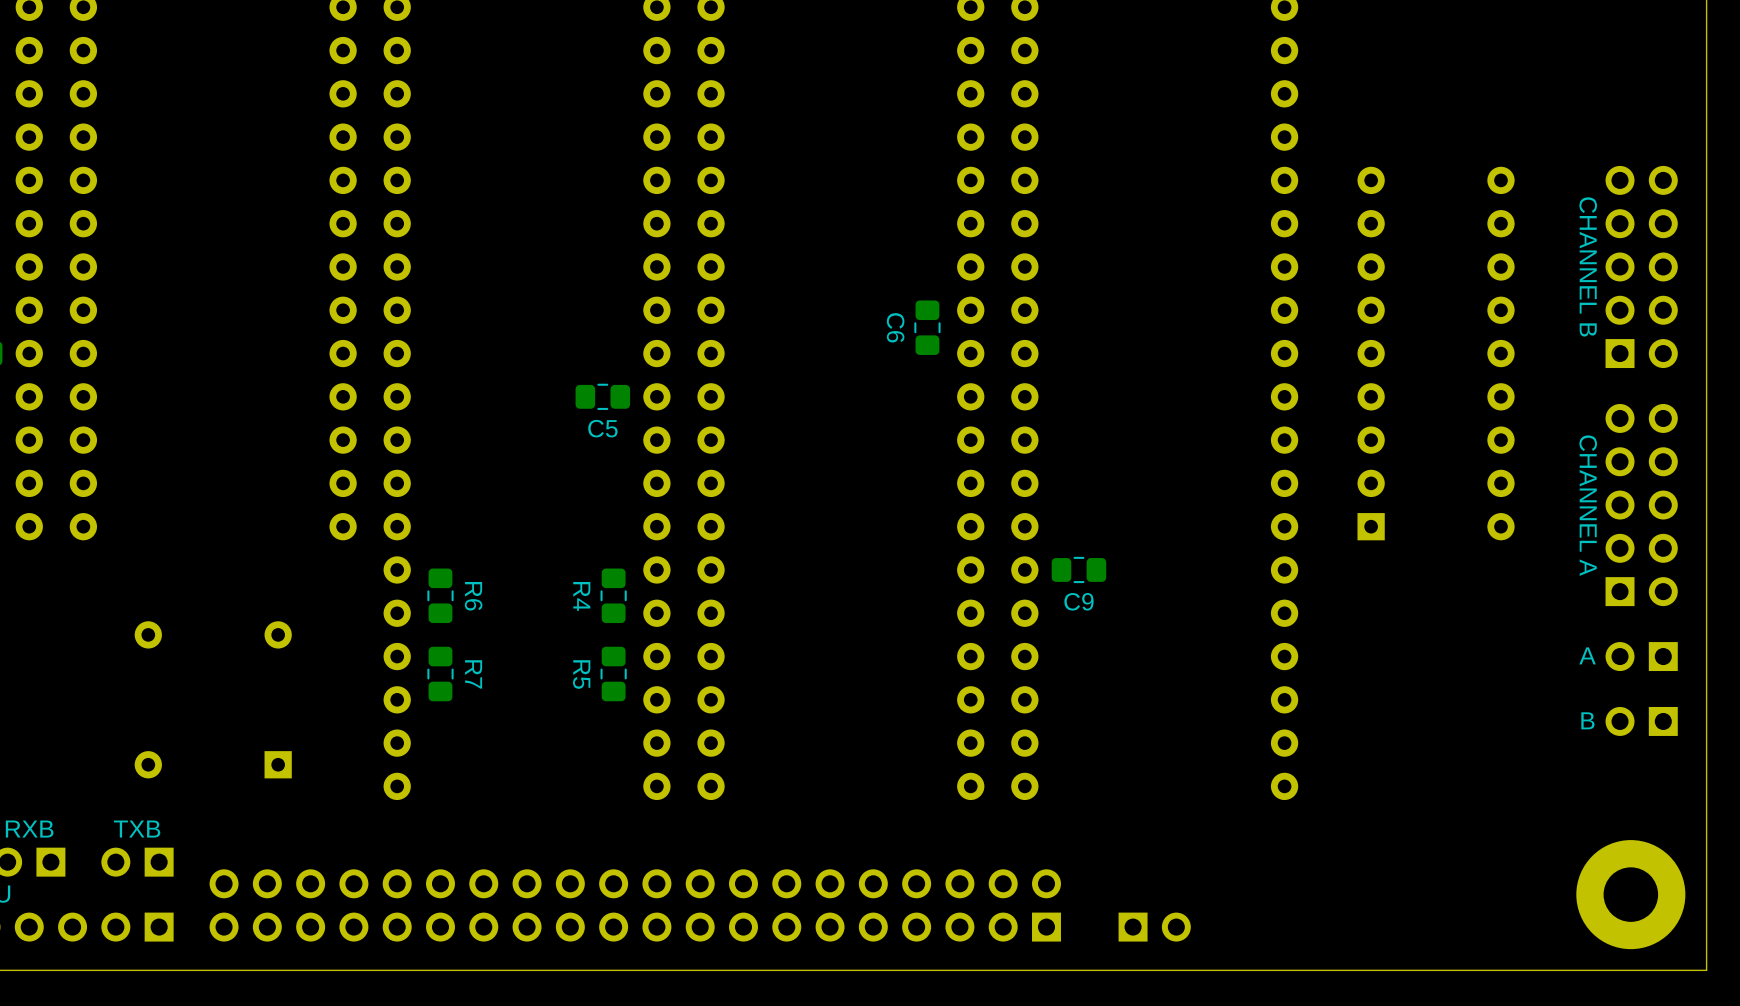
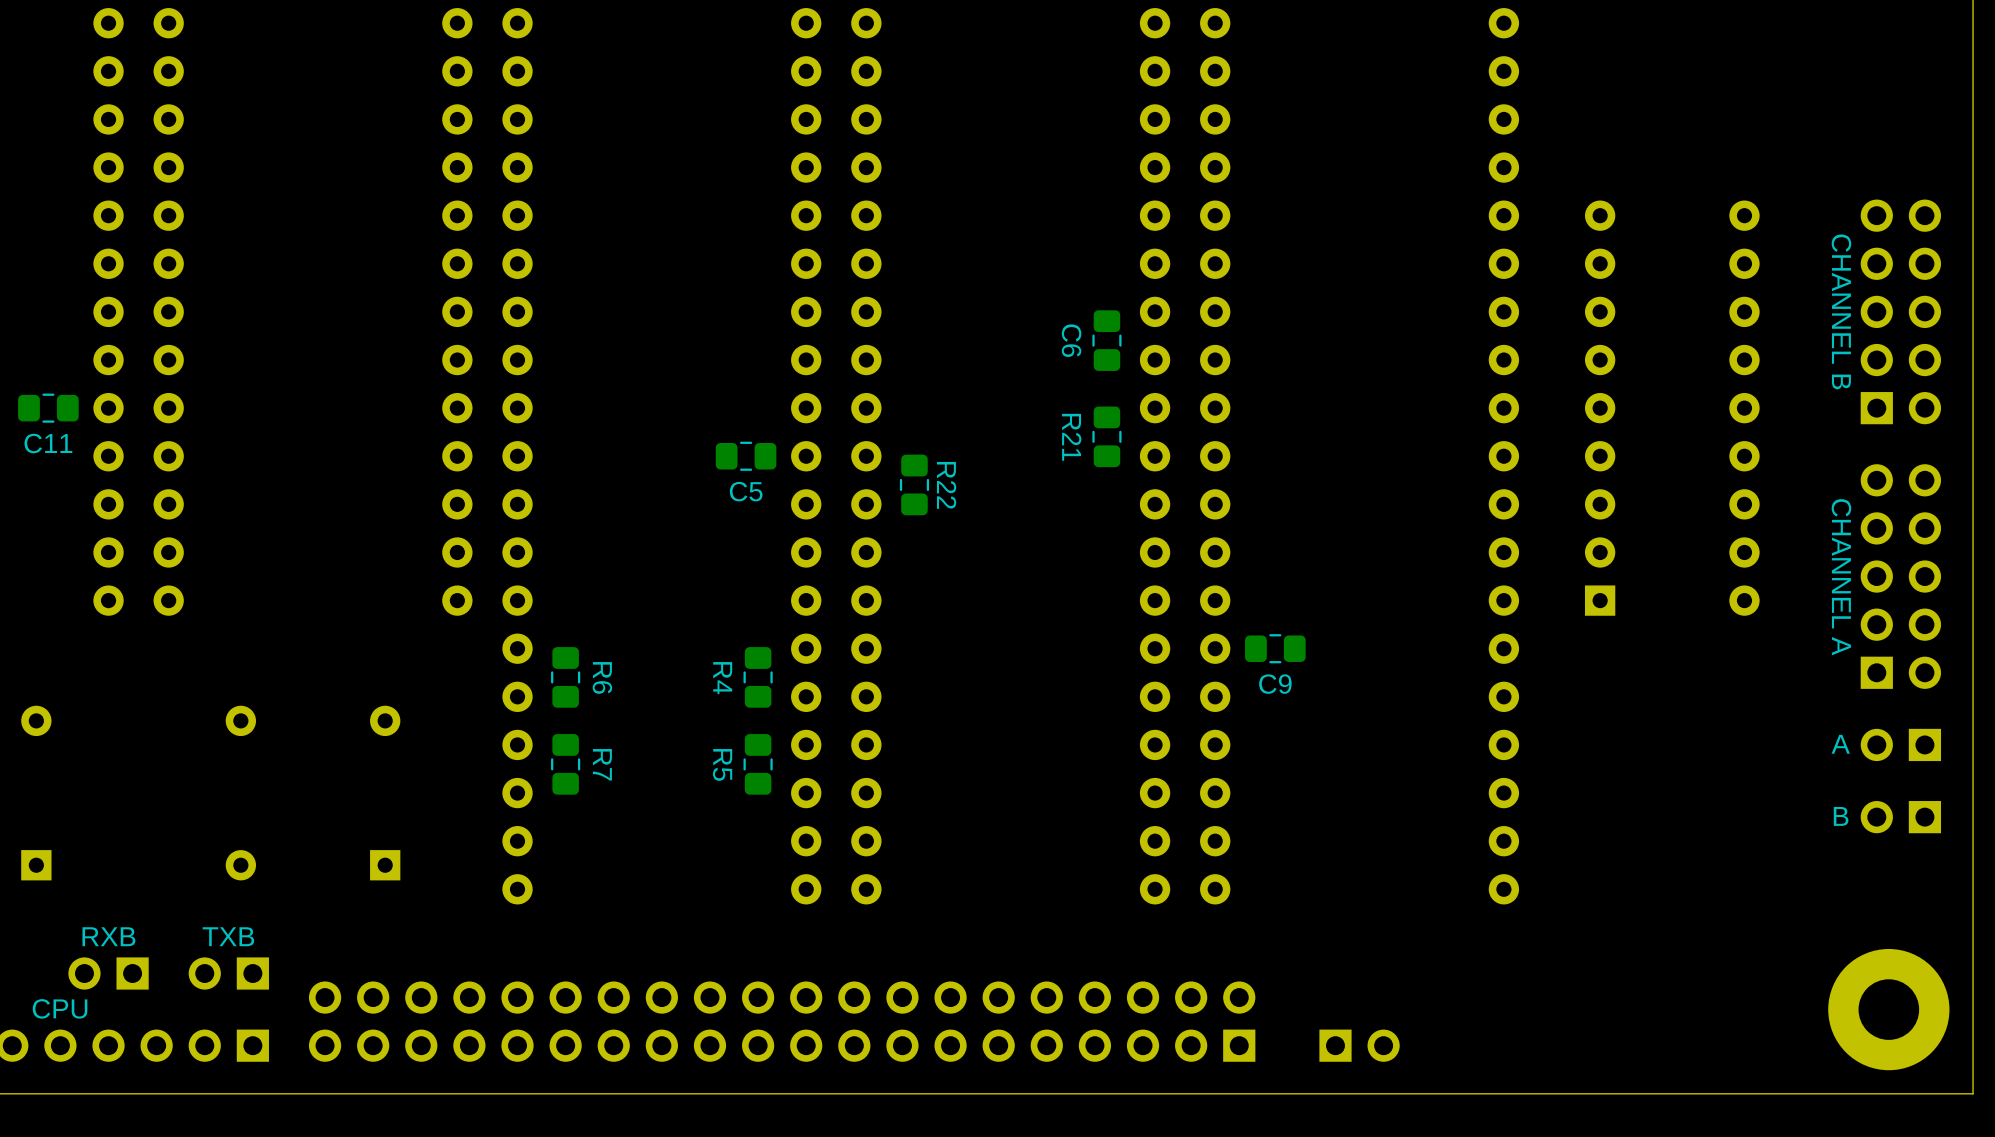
C6 position: (927, 327) -> (1106, 340)
R21: none -> (1106, 436)
R22: none -> (914, 484)

